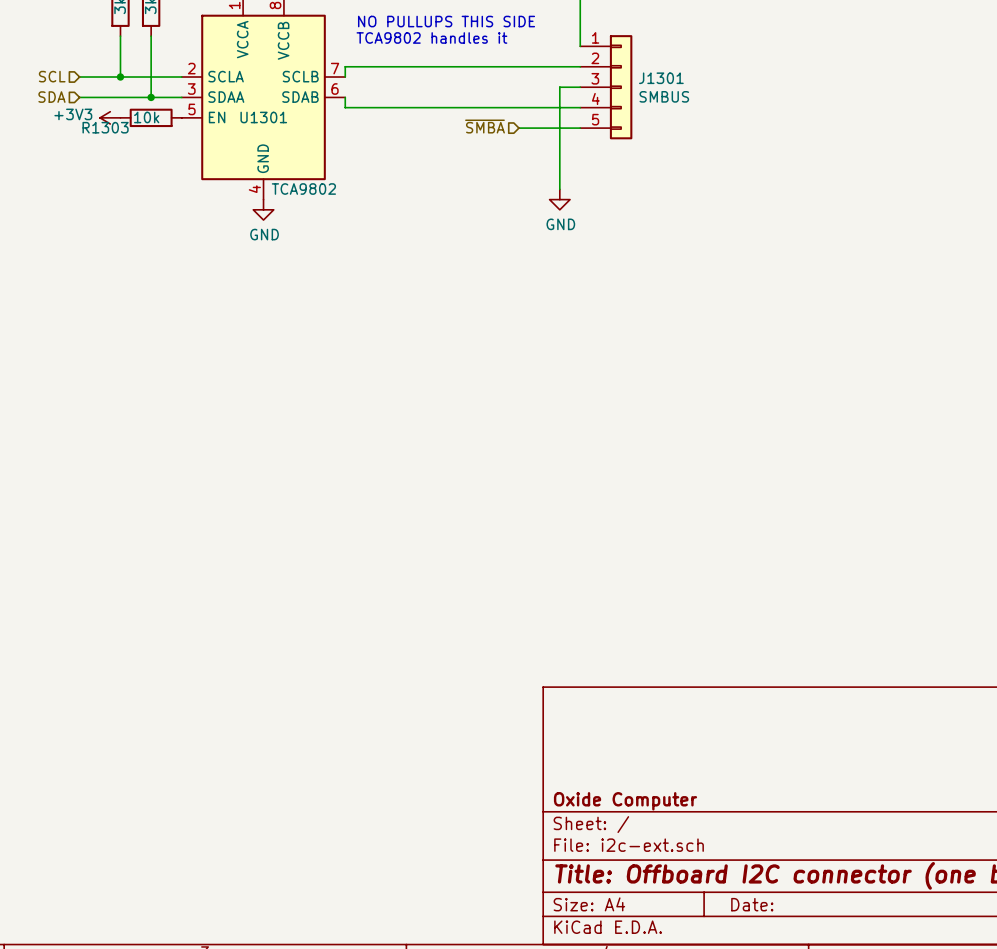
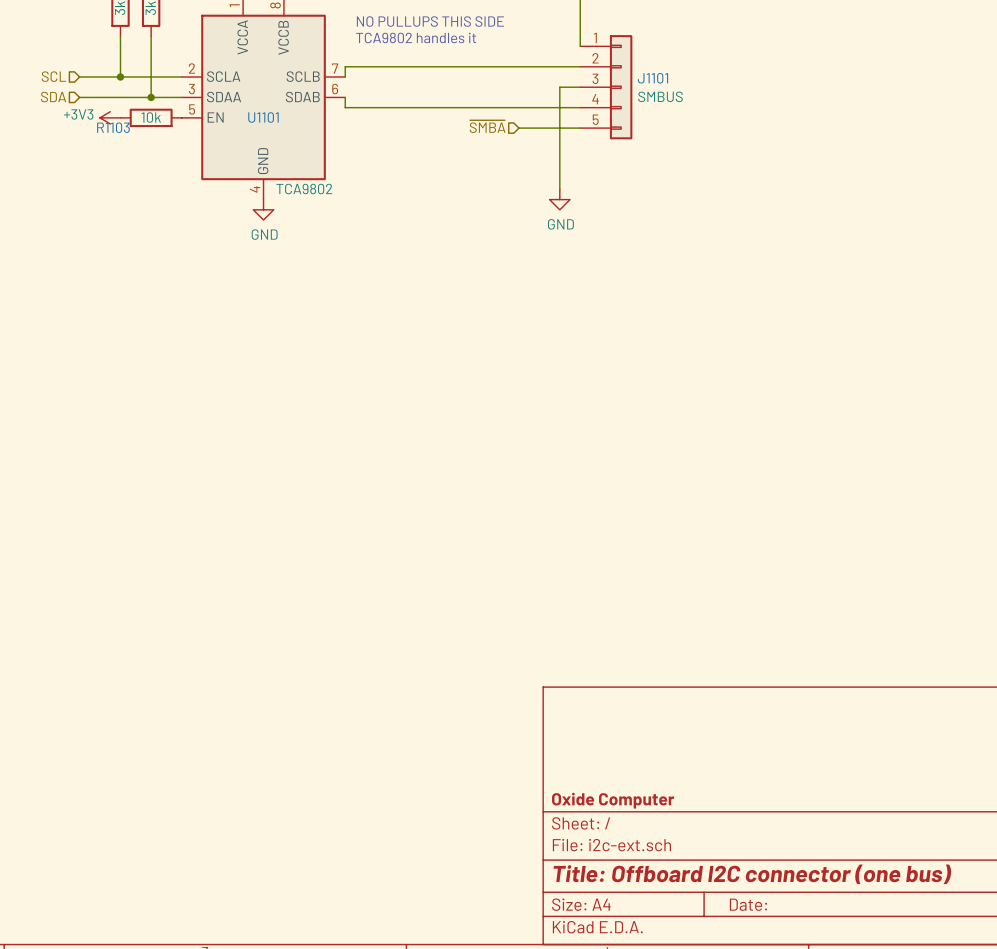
J1301 name: J1301 (661, 78) -> J1101 (652, 78)
U1301 name: U1301 (263, 117) -> U1101 (263, 117)
R1303 name: R1303 (105, 127) -> R1103 (113, 127)

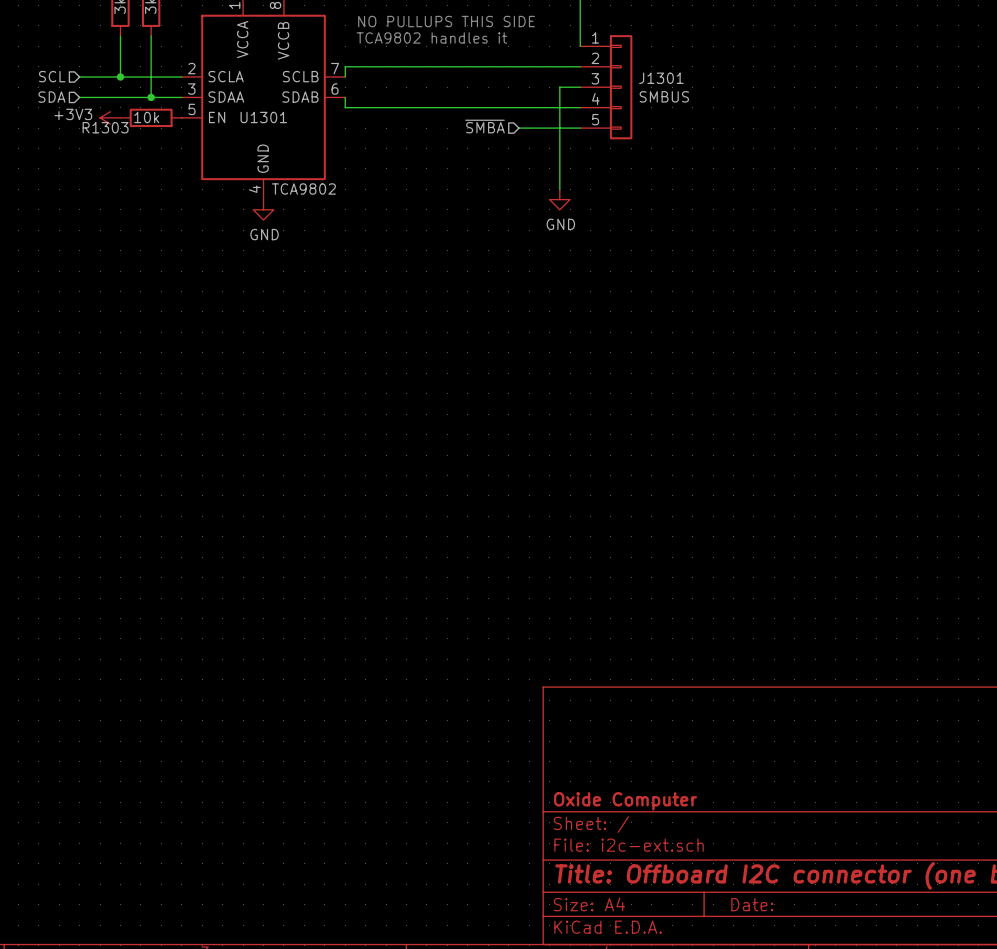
J1101 name: J1101 (652, 78) -> J1301 (661, 78)
U1101 name: U1101 (263, 117) -> U1301 (263, 117)
R1103 name: R1103 (113, 127) -> R1303 (105, 127)

